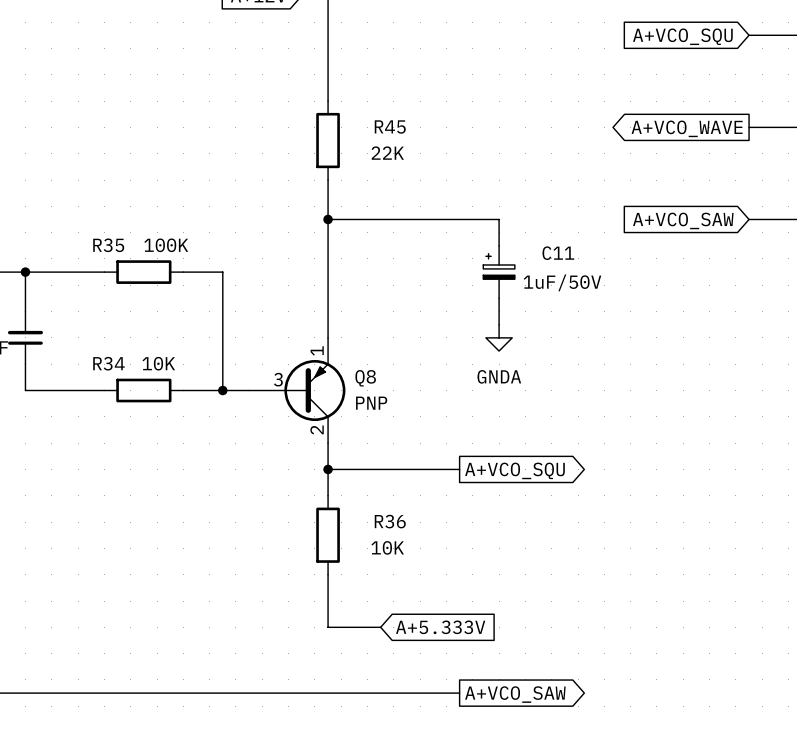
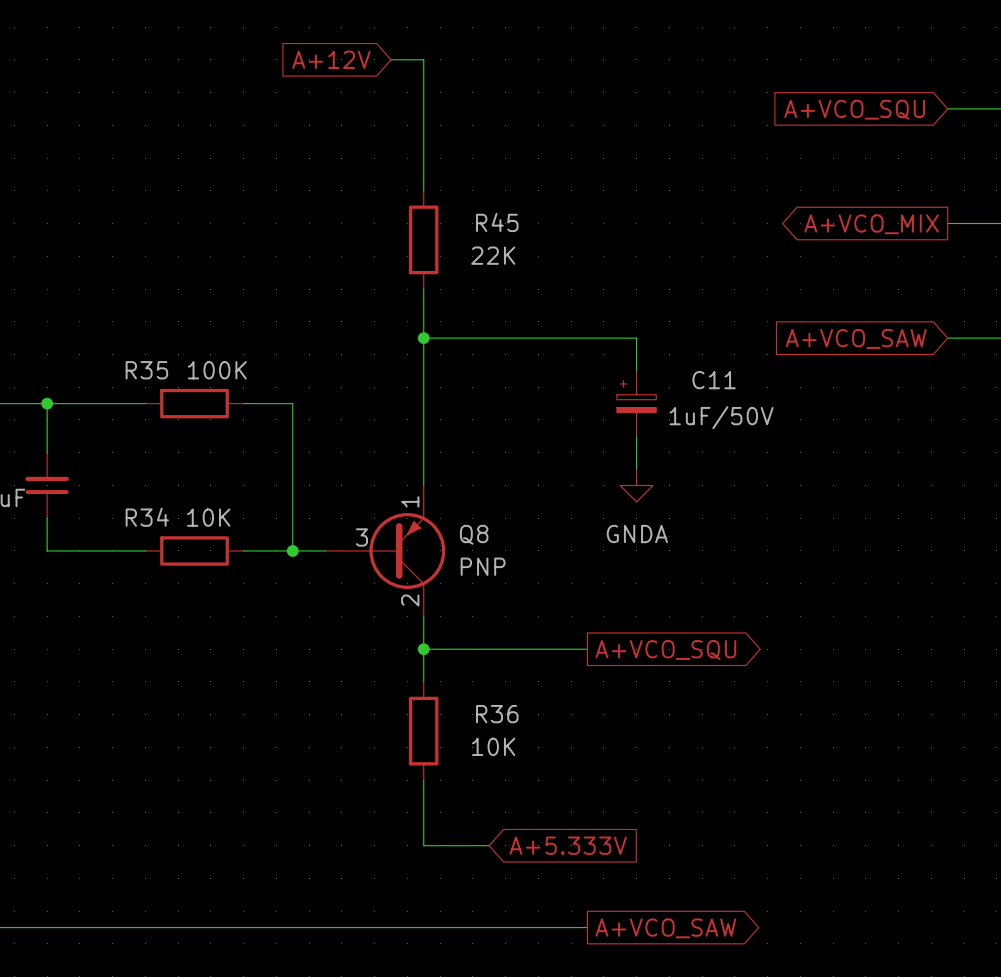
global label: A+VCO_WAVE (687, 128) -> A+VCO_MIX (871, 224)

